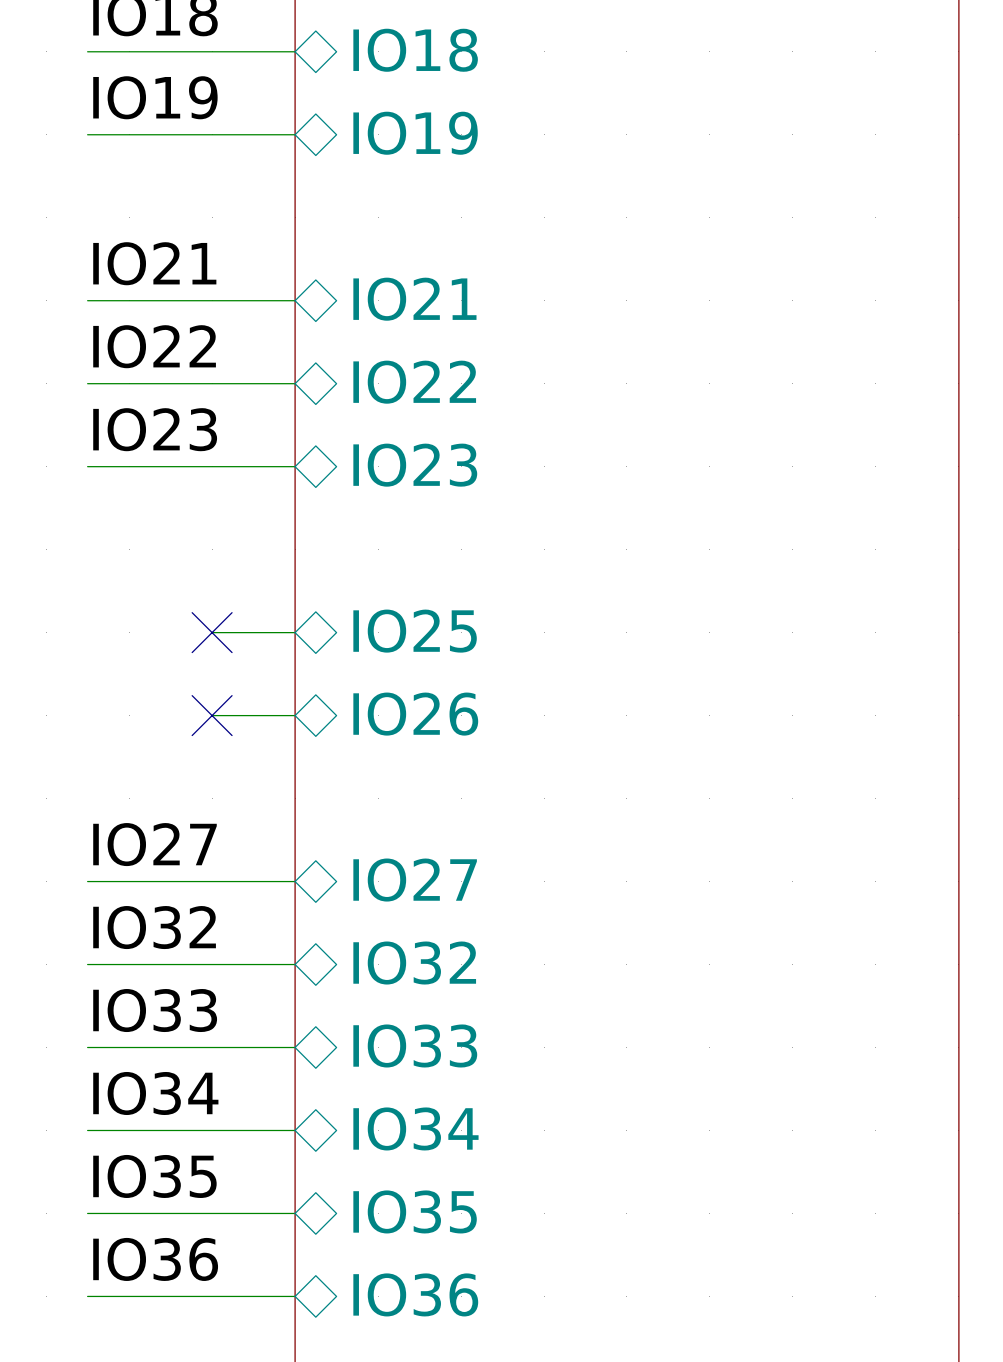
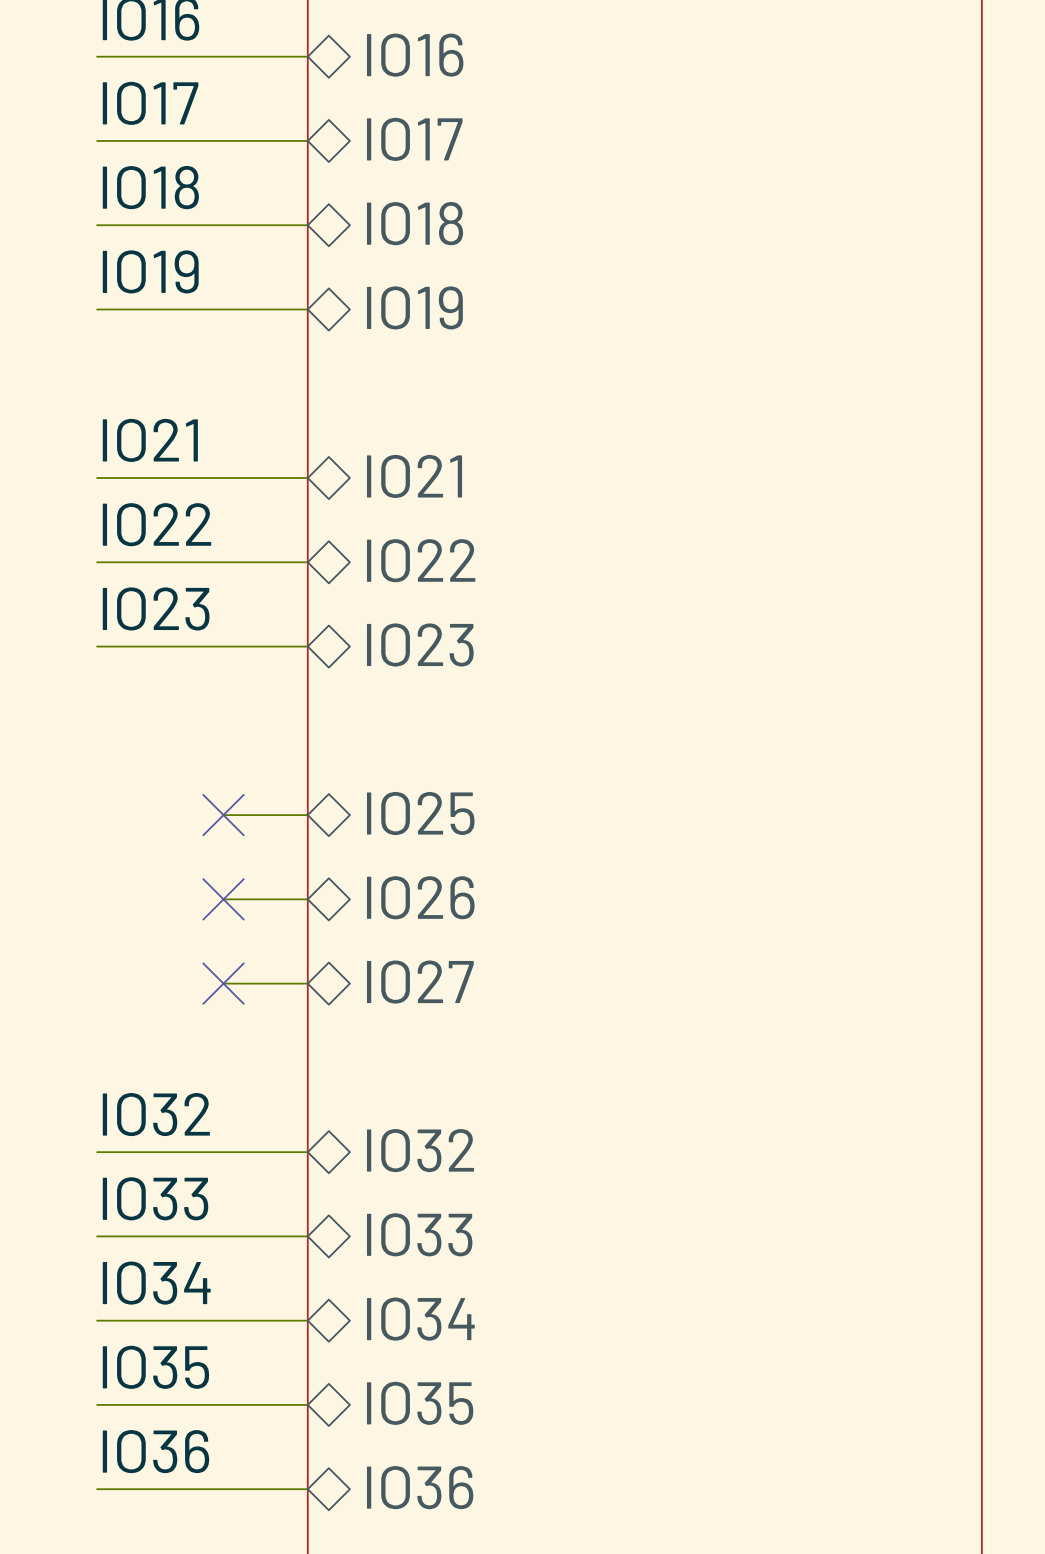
wire: none -> (223, 983) (307, 983)
no-connect mark: none -> (223, 983)
label: IO27 (154, 844) -> none
sheet pin position: IO27 (415, 880) -> IO27 (420, 982)
wire: (87, 881) (295, 881) -> none

